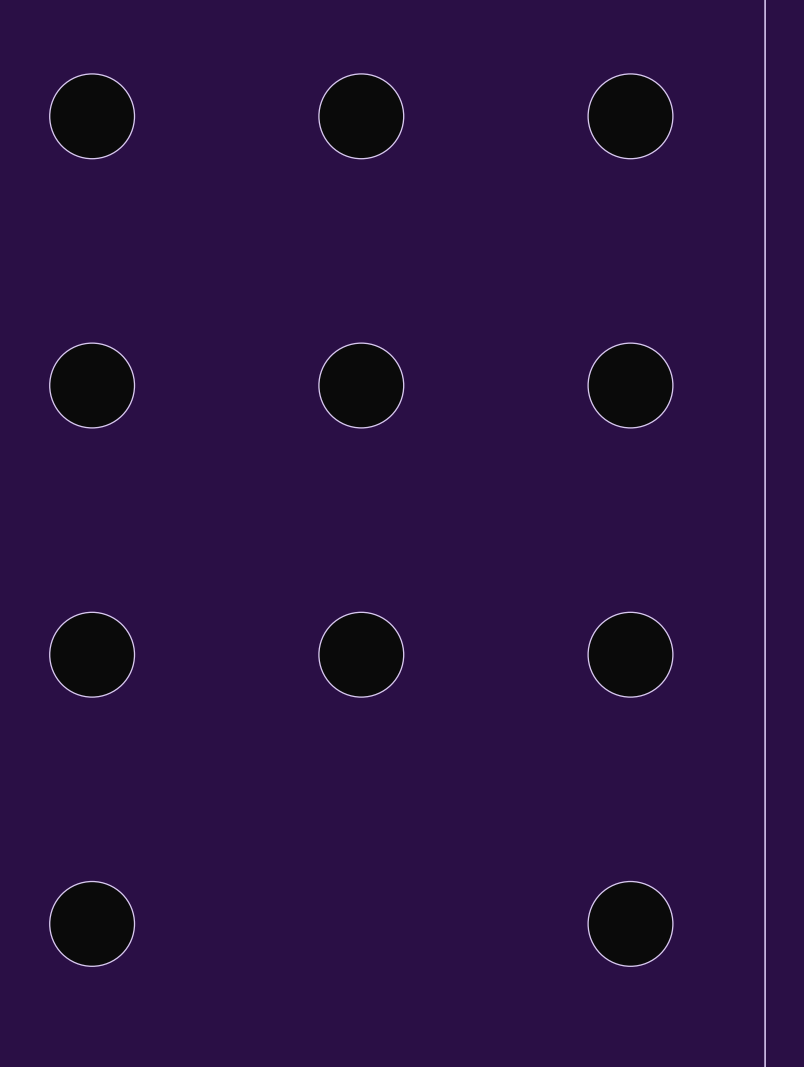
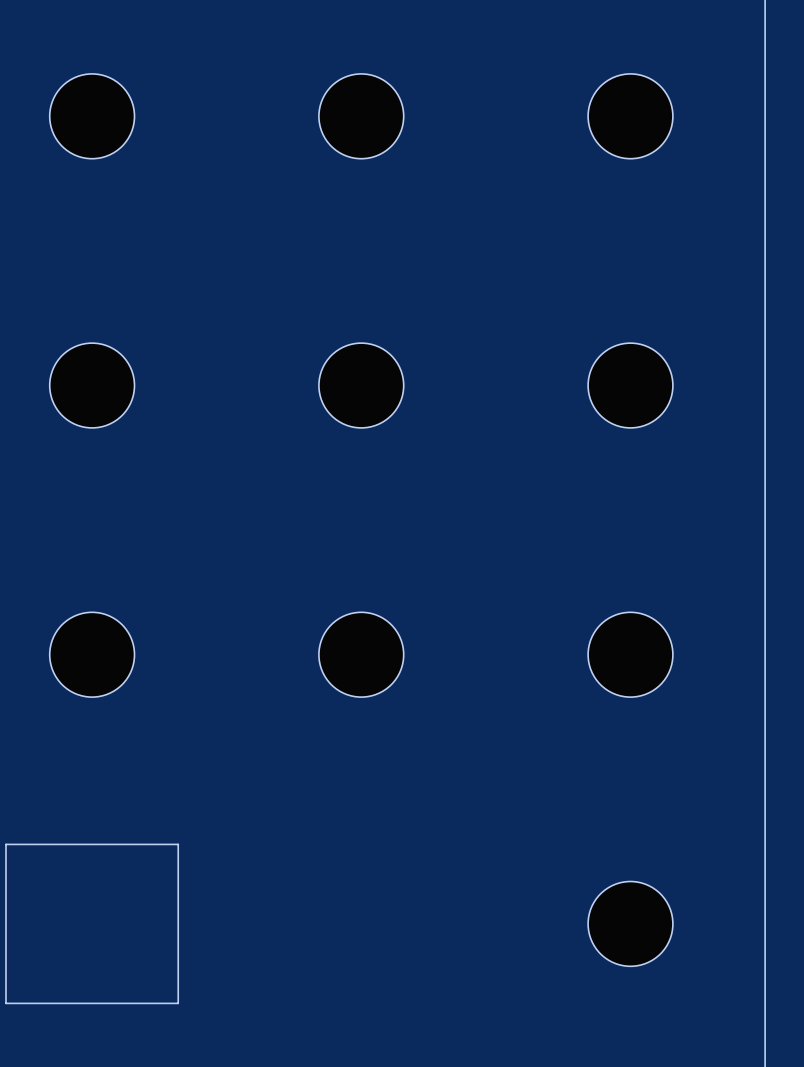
board edge: none -> (178, 844) (6, 844) (6, 1003) (178, 1003) (178, 844)
part: (92, 923) -> none

